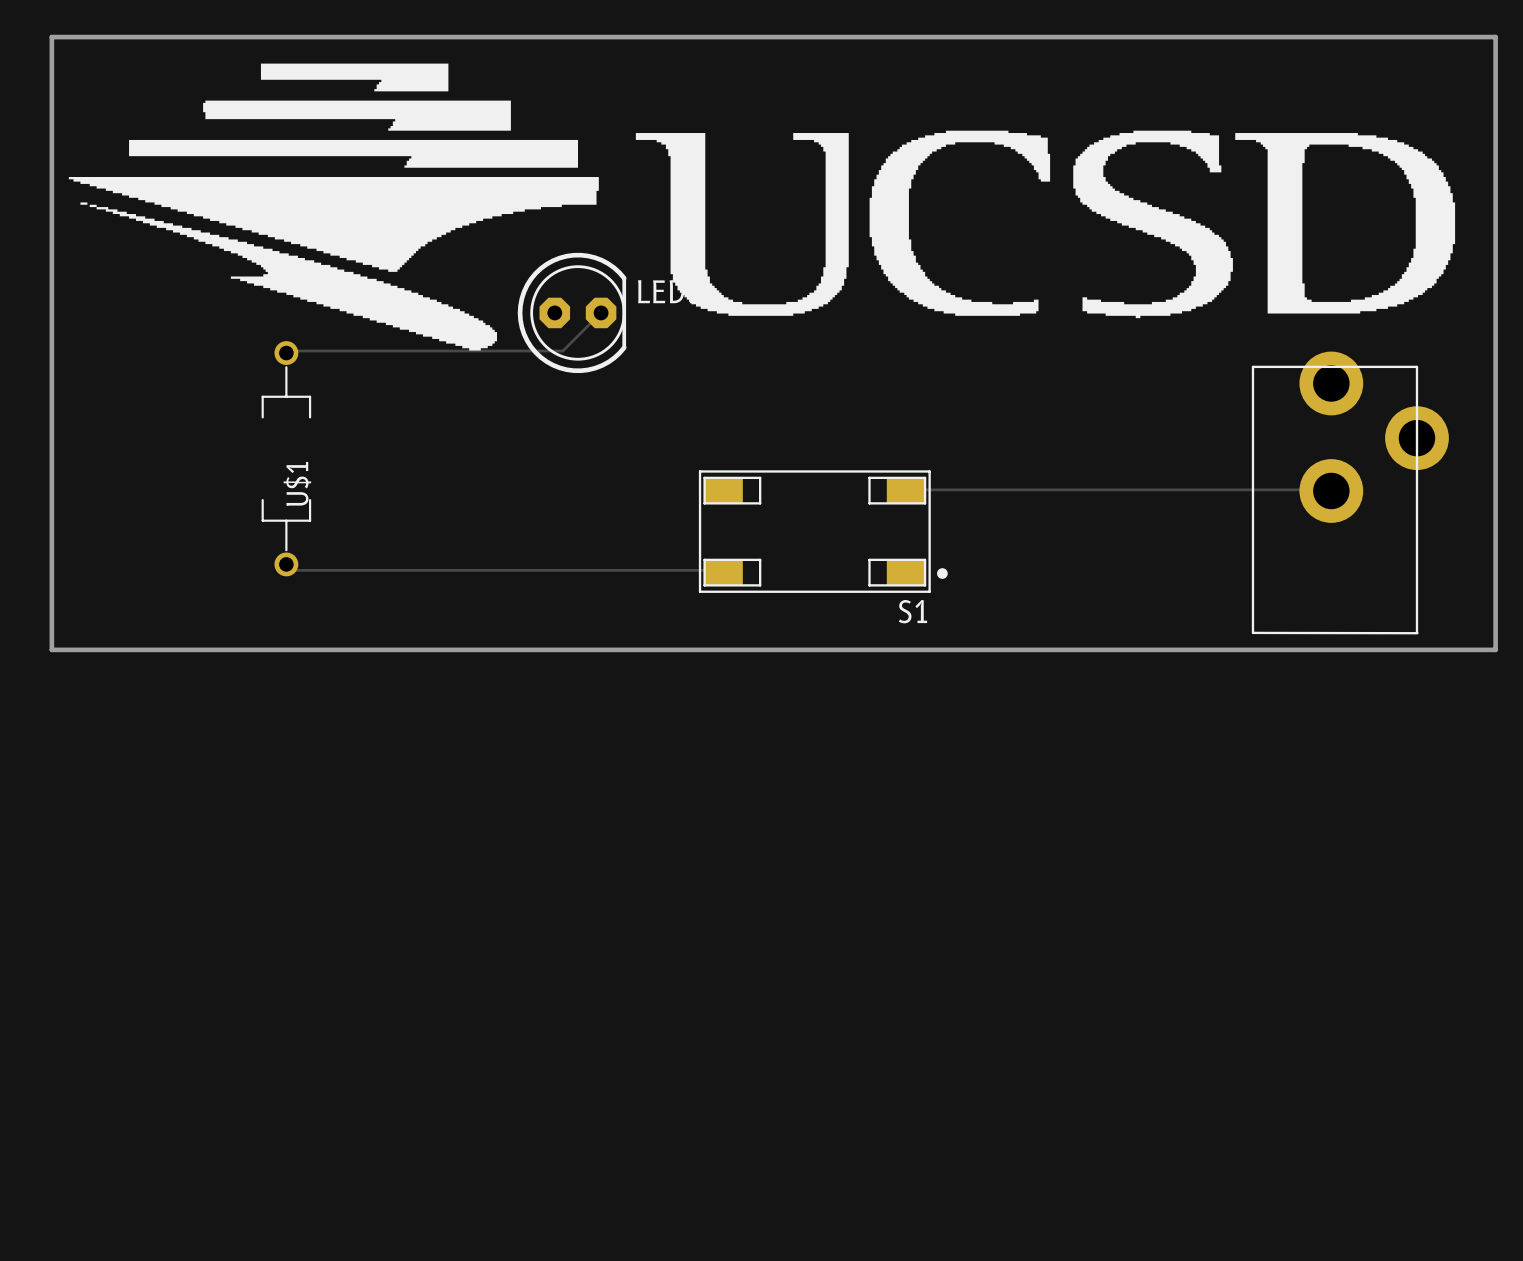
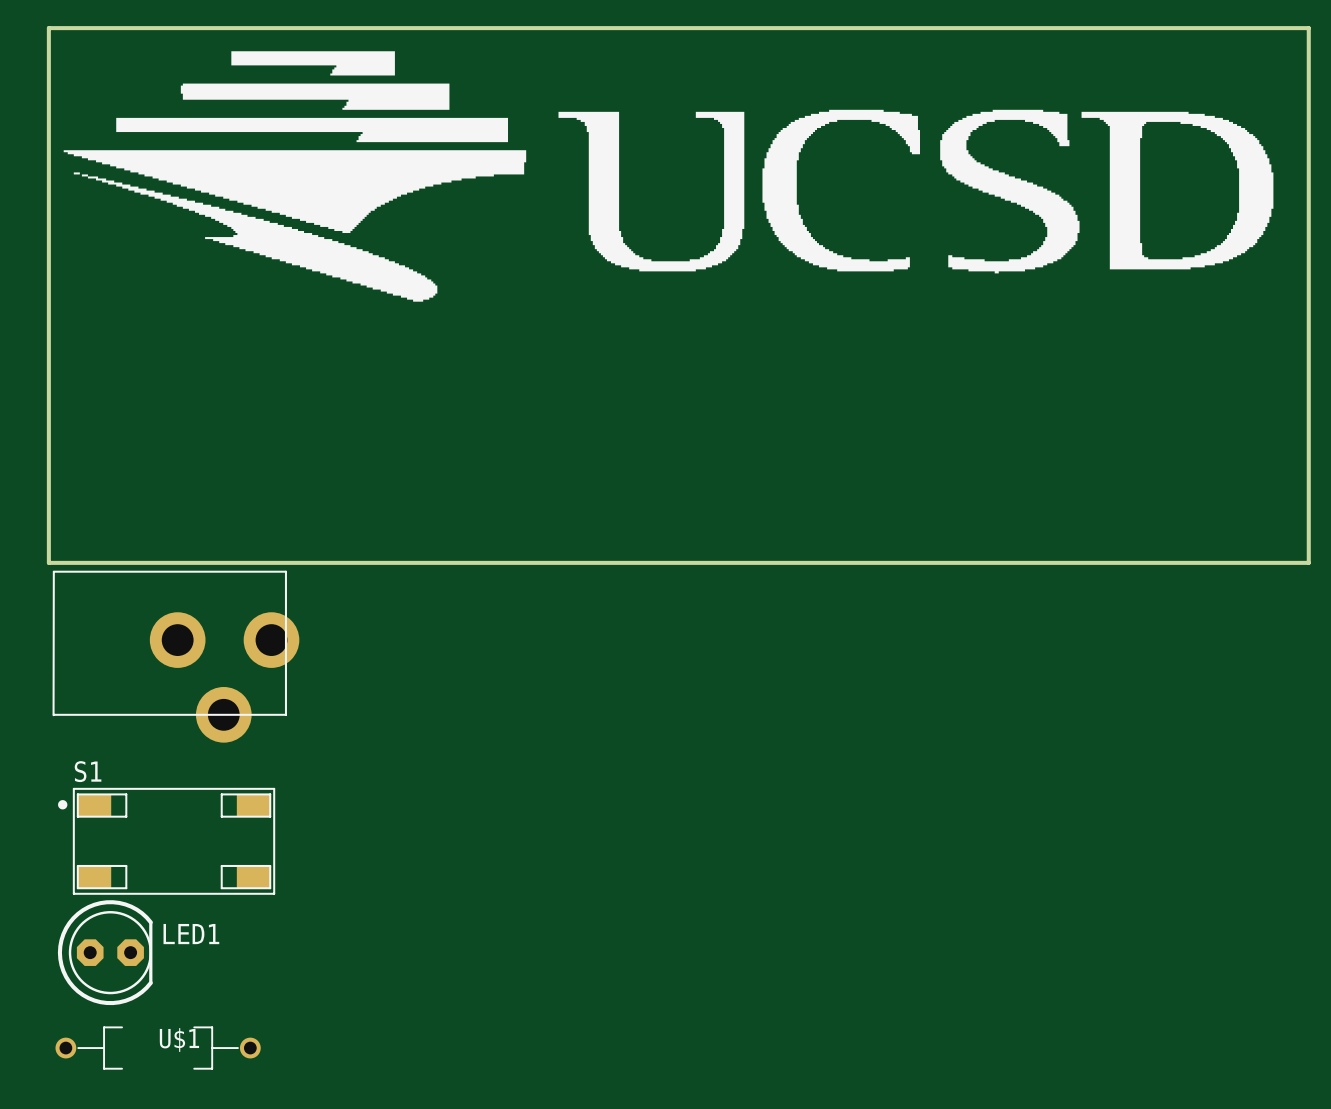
LED1 position: (572, 312) -> (105, 952)
track: (601, 312) (562, 351) (287, 351) (286, 353) -> none
U$1 rotation: 0° (286, 458) -> 90° clockwise (158, 1048)
U$1 position: (286, 458) -> (158, 1048)
U$1 name position: U$1 (297, 483) -> U$1 (179, 1040)
track: (905, 490) (1331, 490) -> none
part: (1350, 492) -> none
S1 rotation: 0° (823, 531) -> 180° (166, 841)
S1 position: (823, 531) -> (166, 841)
track: (286, 564) (293, 570) (721, 570) (723, 572) -> none
part: none -> (175, 656)

